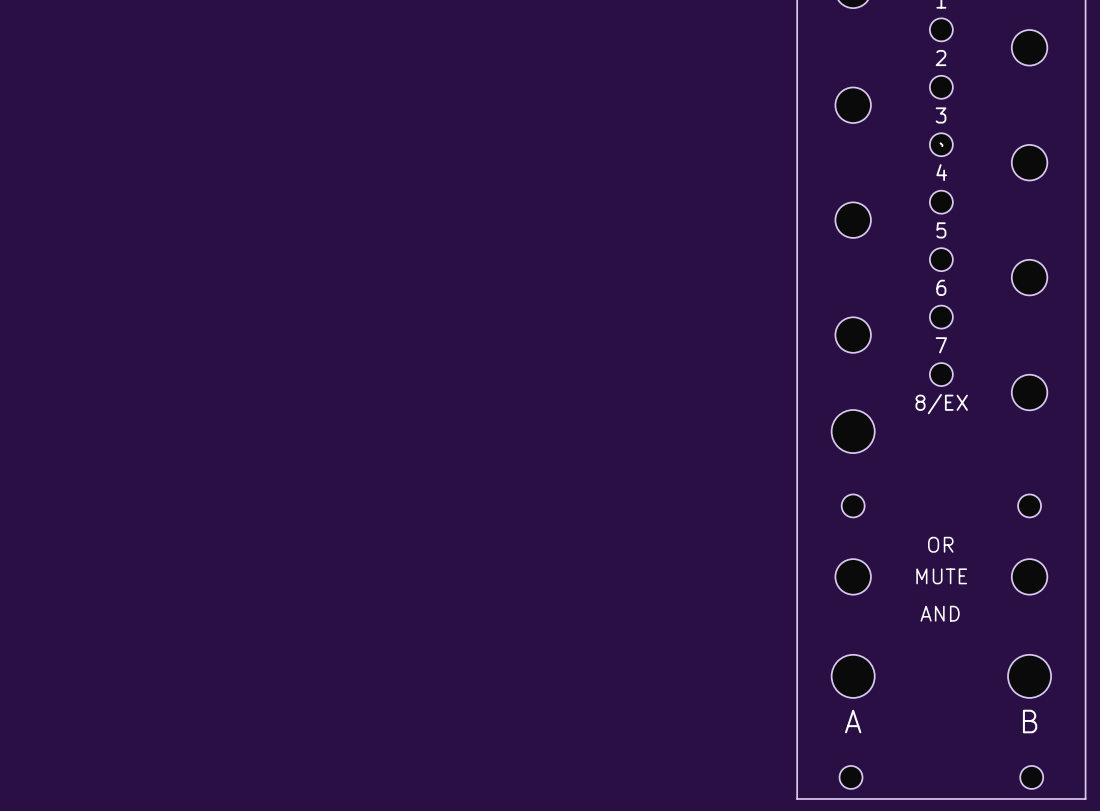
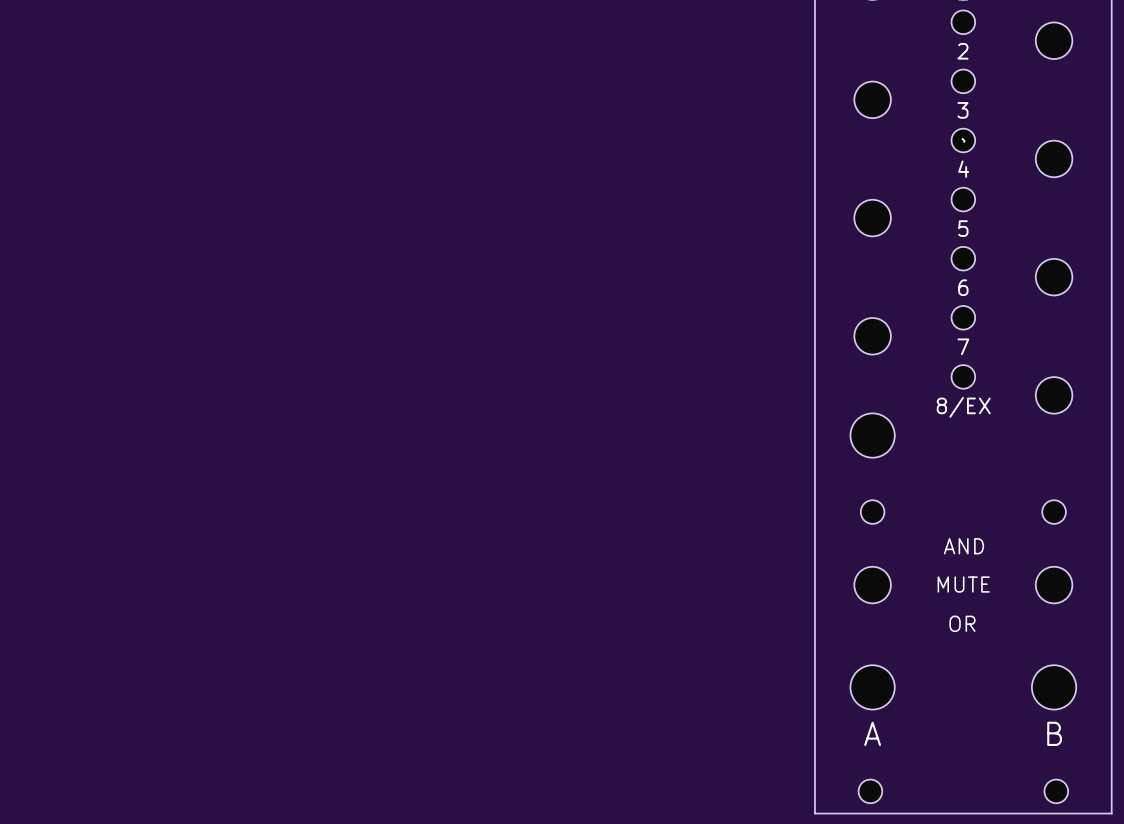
text position: OR (940, 544) -> OR (962, 623)
text position: AND (940, 613) -> AND (963, 546)

